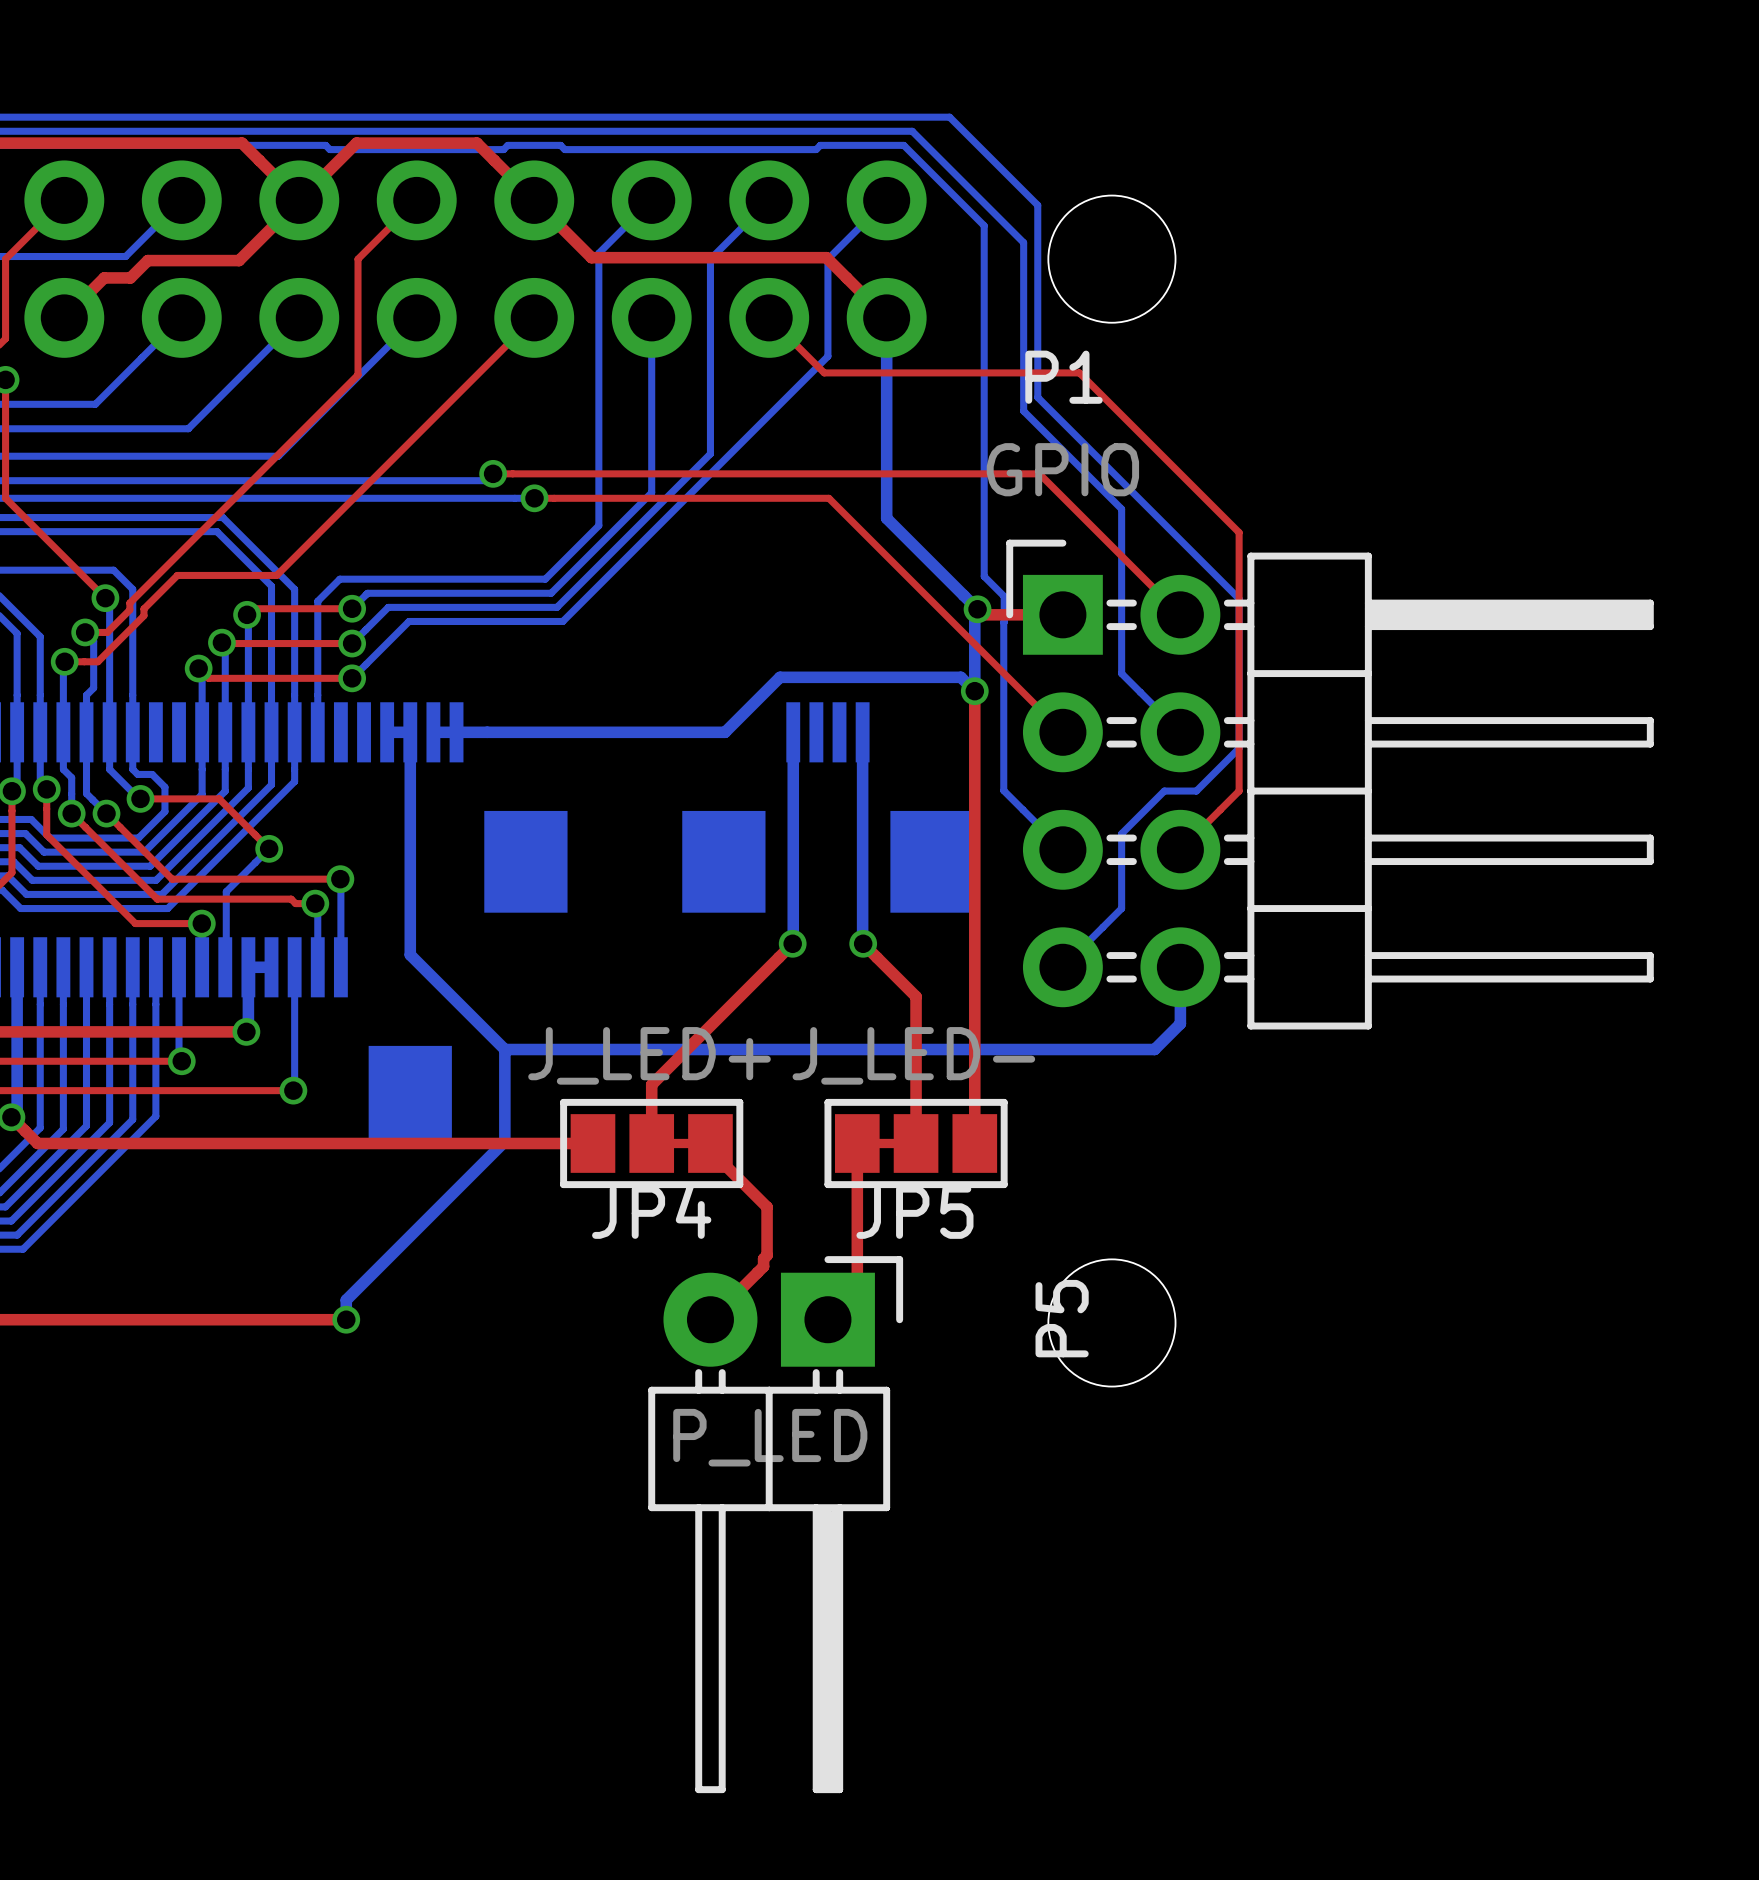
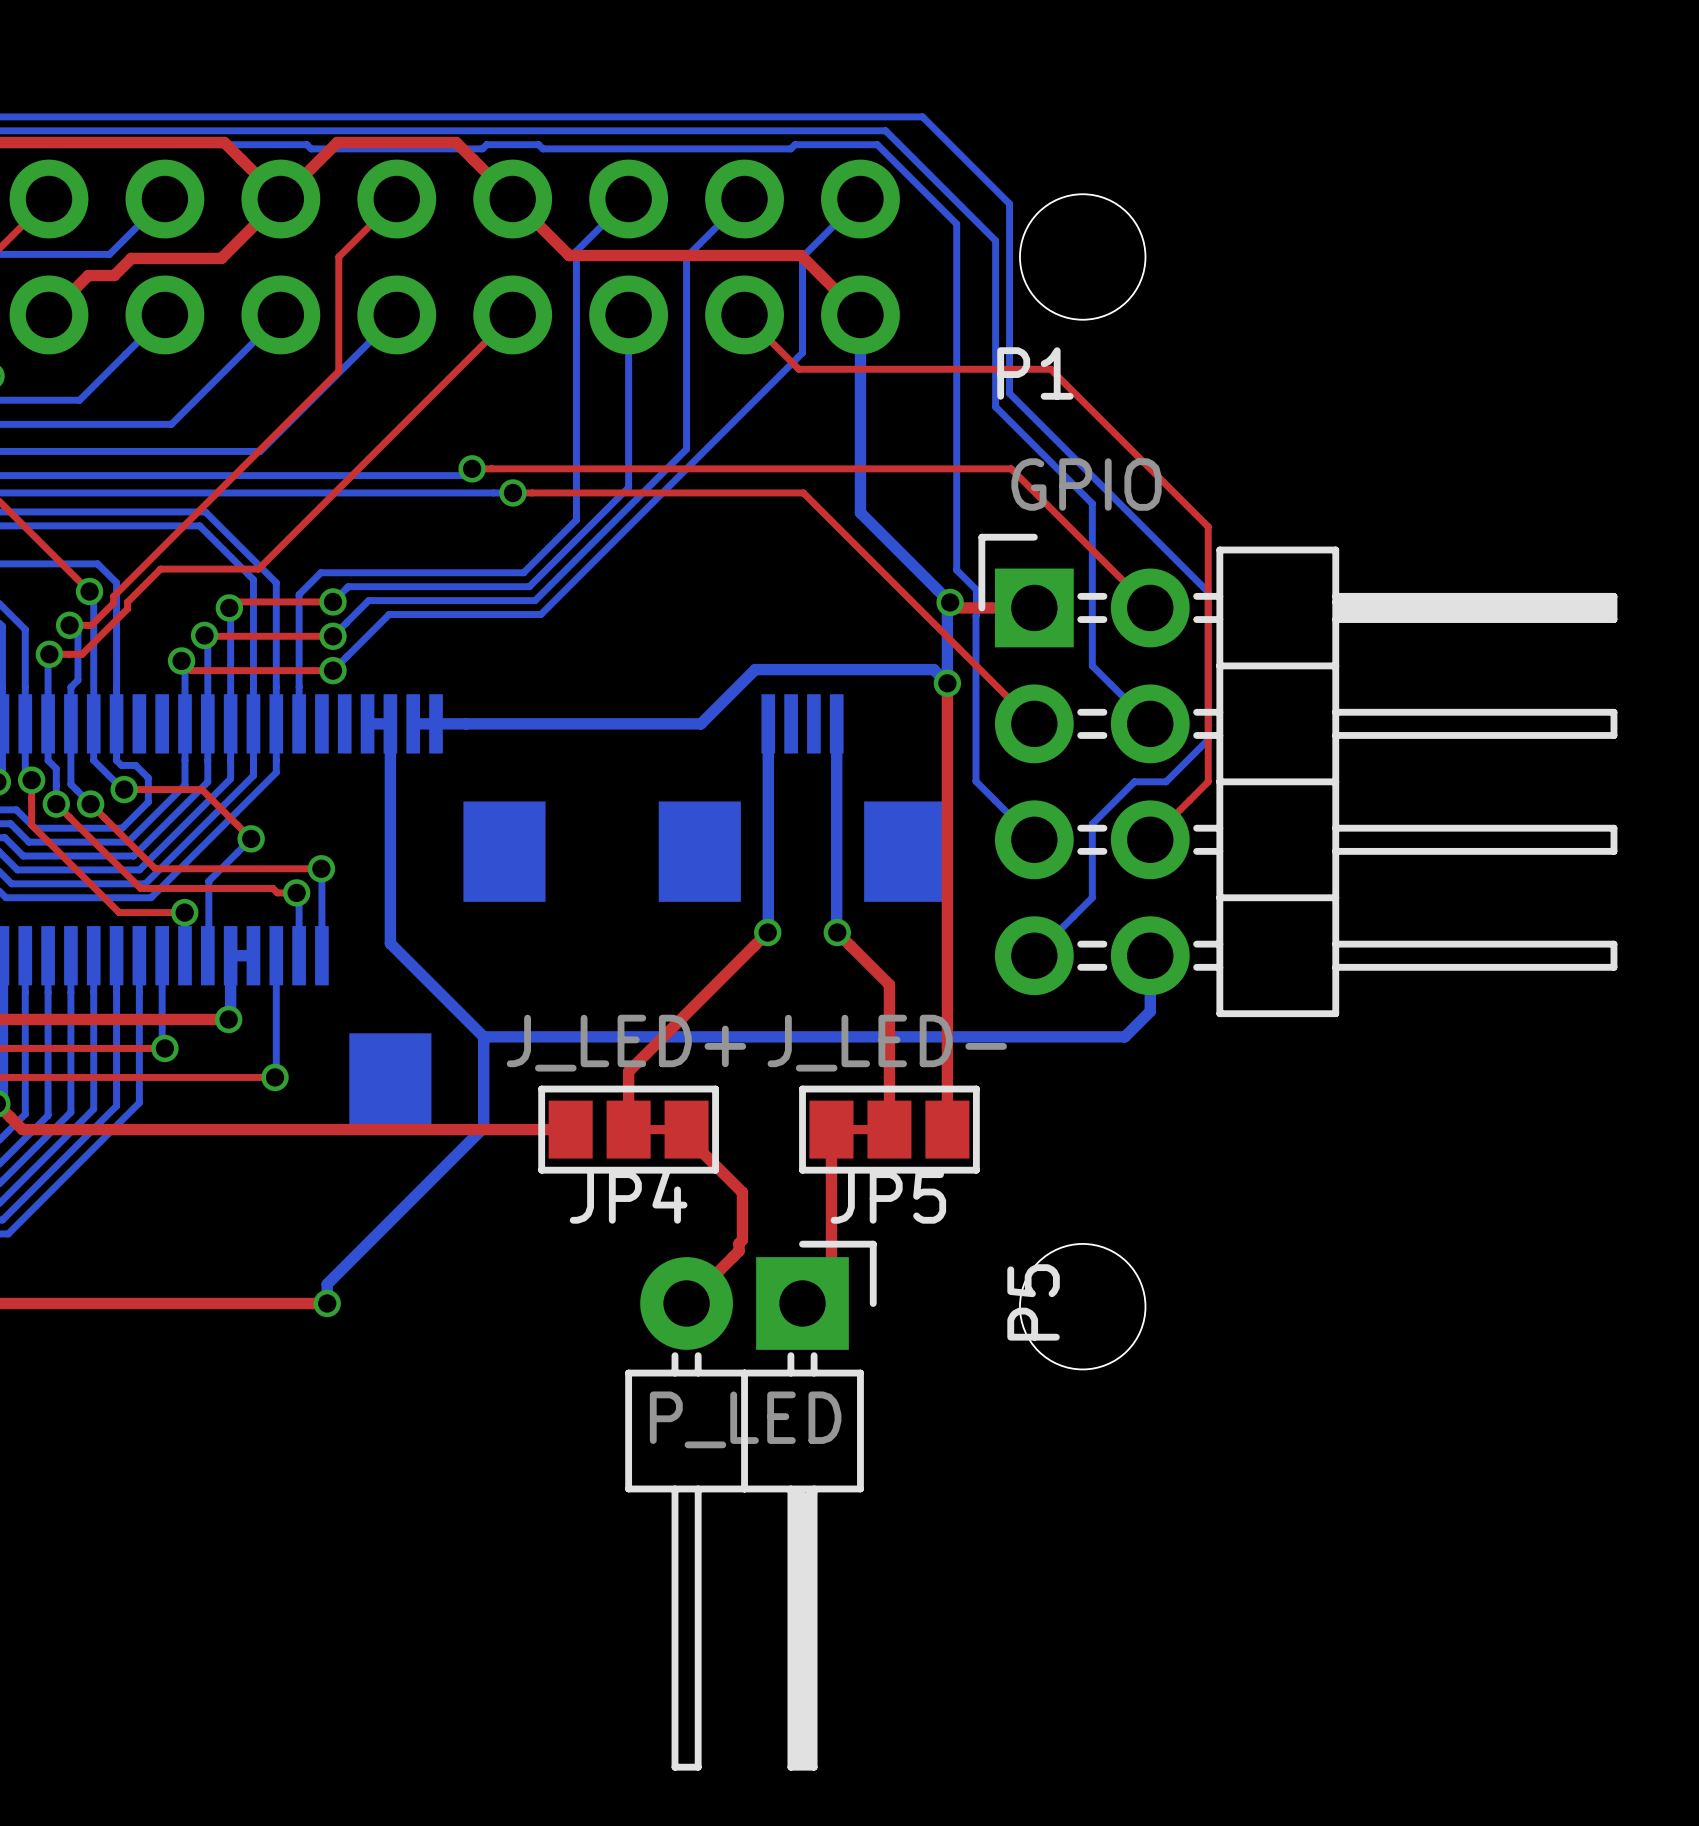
P1 value position: GPIO (1062, 469) -> GPIO (1086, 484)

